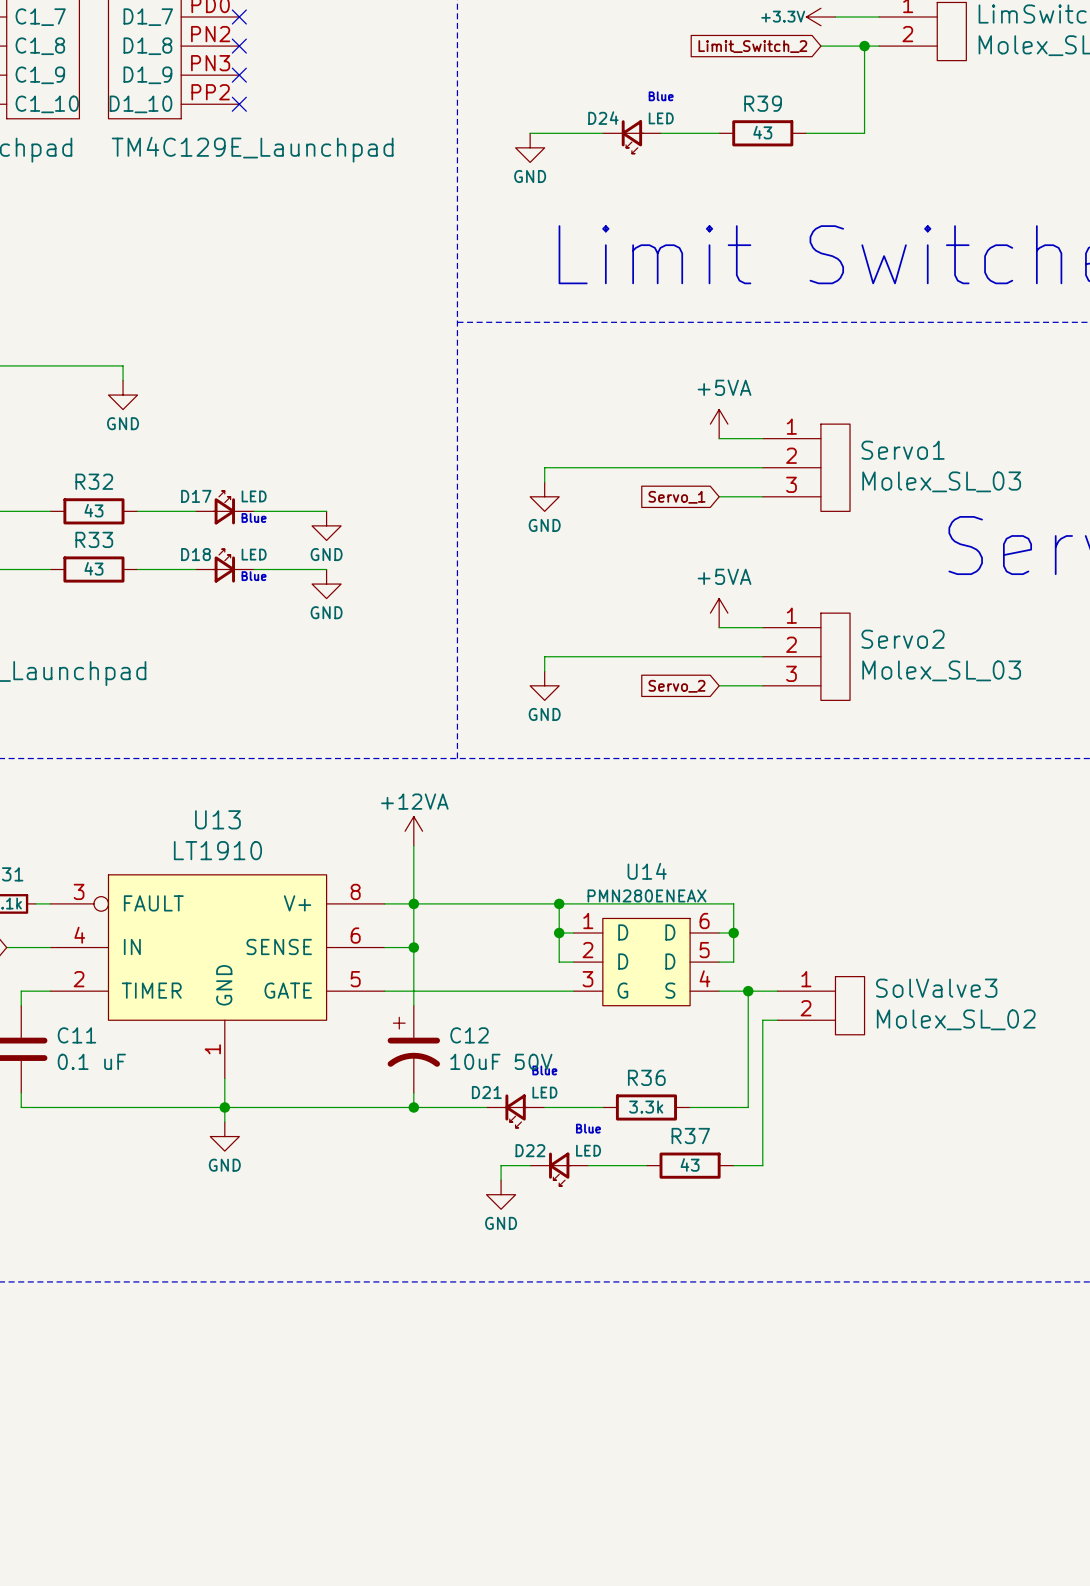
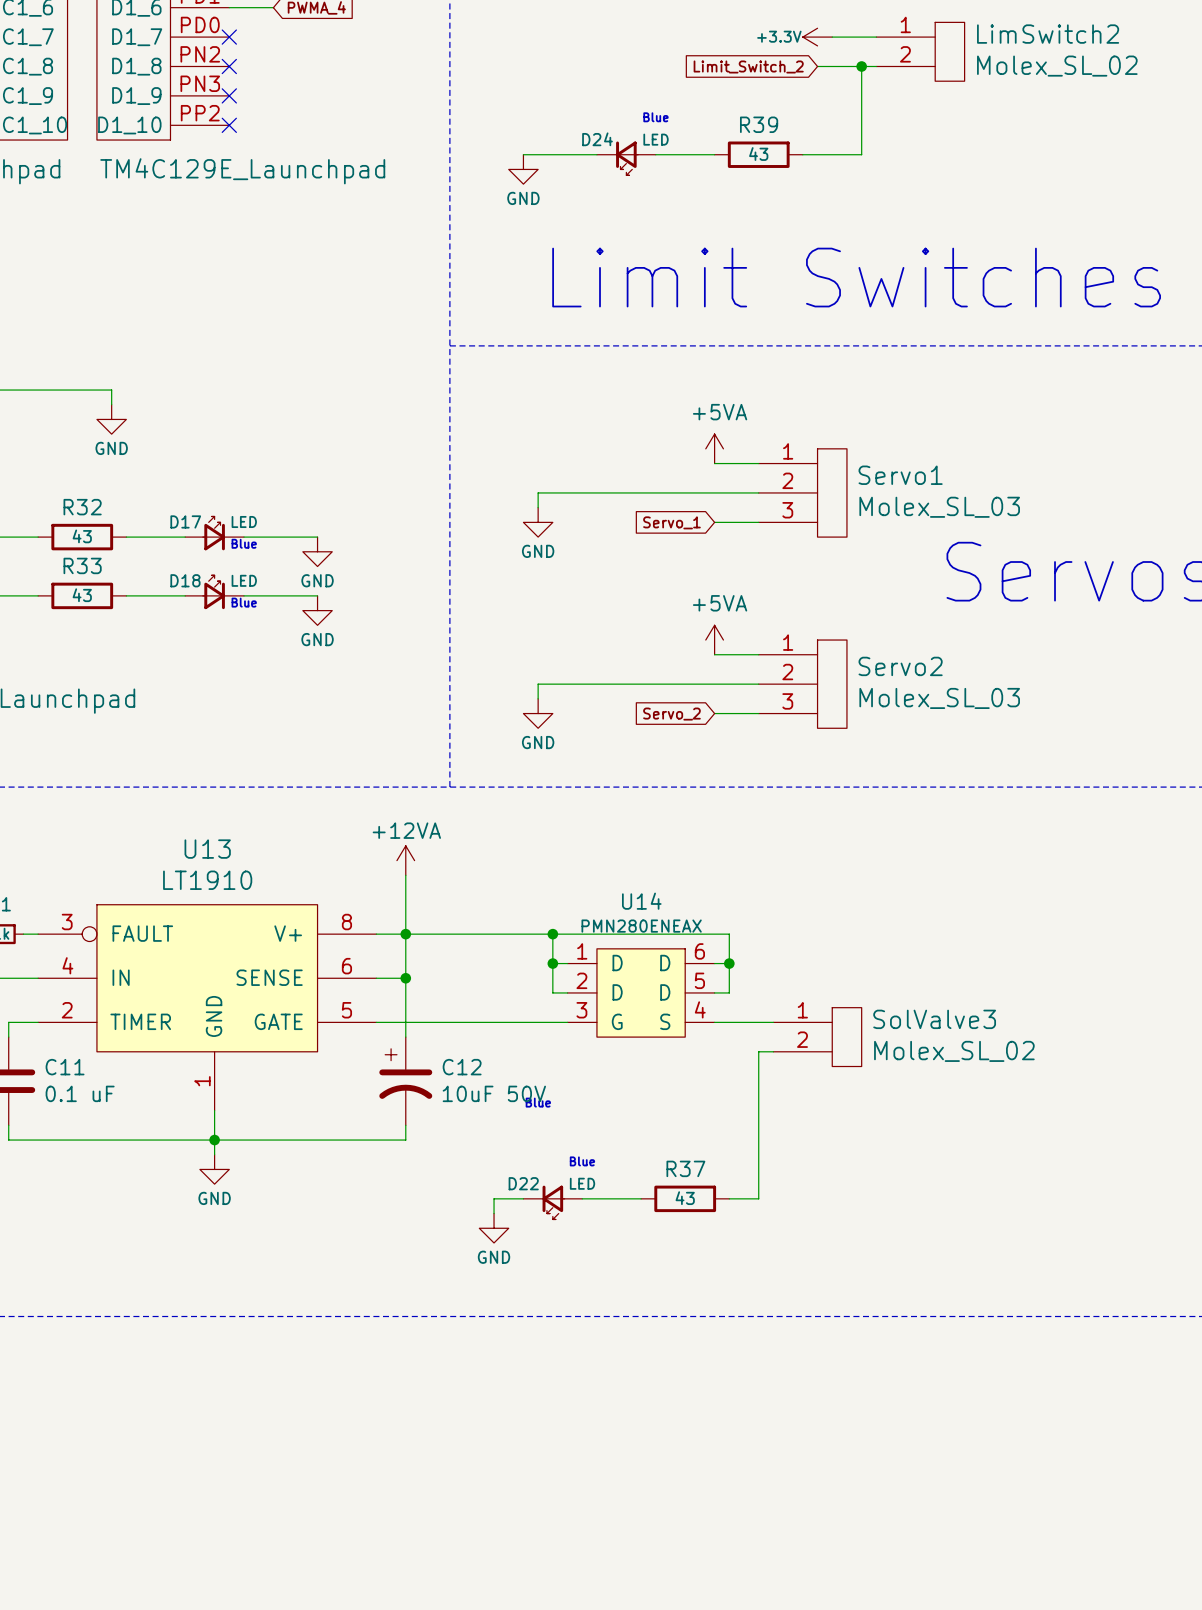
wire: (748, 991) (748, 1107) (690, 1107) -> none
junction: (748, 991) -> none
wire: (413, 1107) (486, 1107) -> none
junction: (413, 1107) -> none
wire: (544, 1107) (602, 1107) -> none
R36: 3.3k (646, 1107) -> none
D21: LED (515, 1111) -> none

